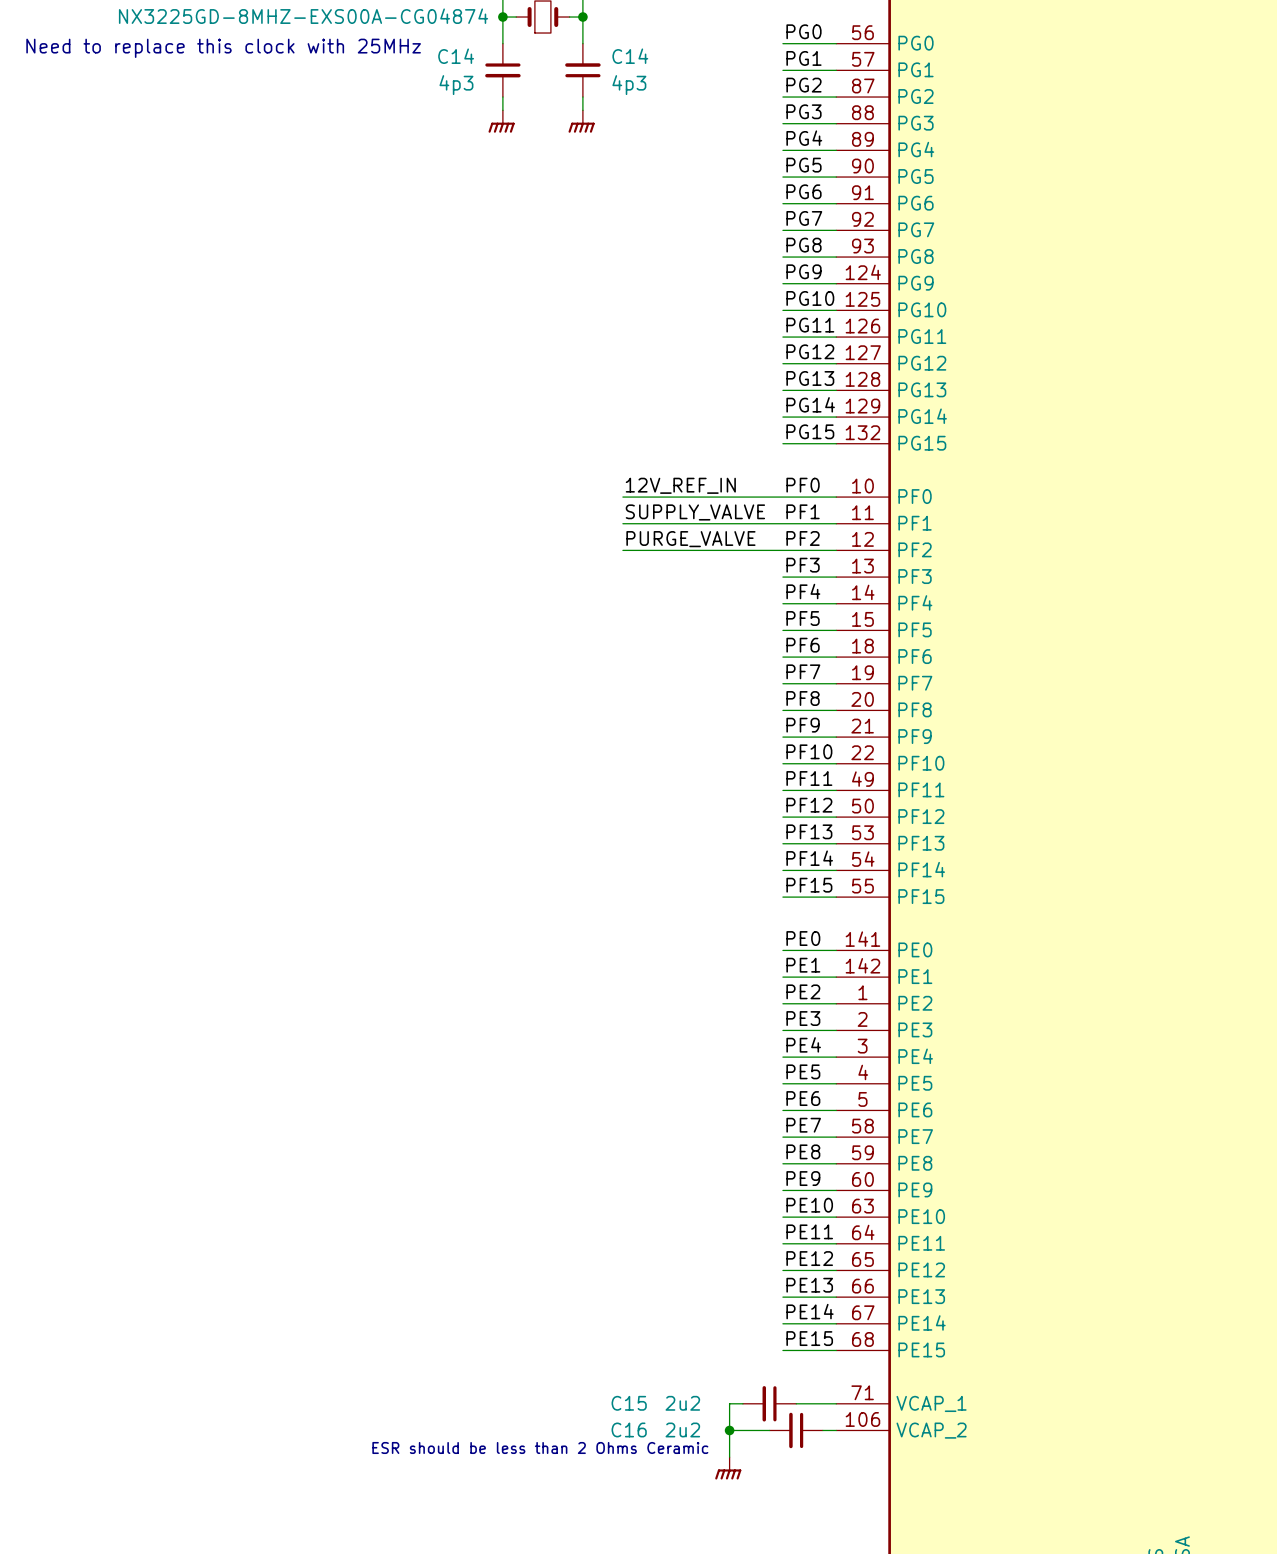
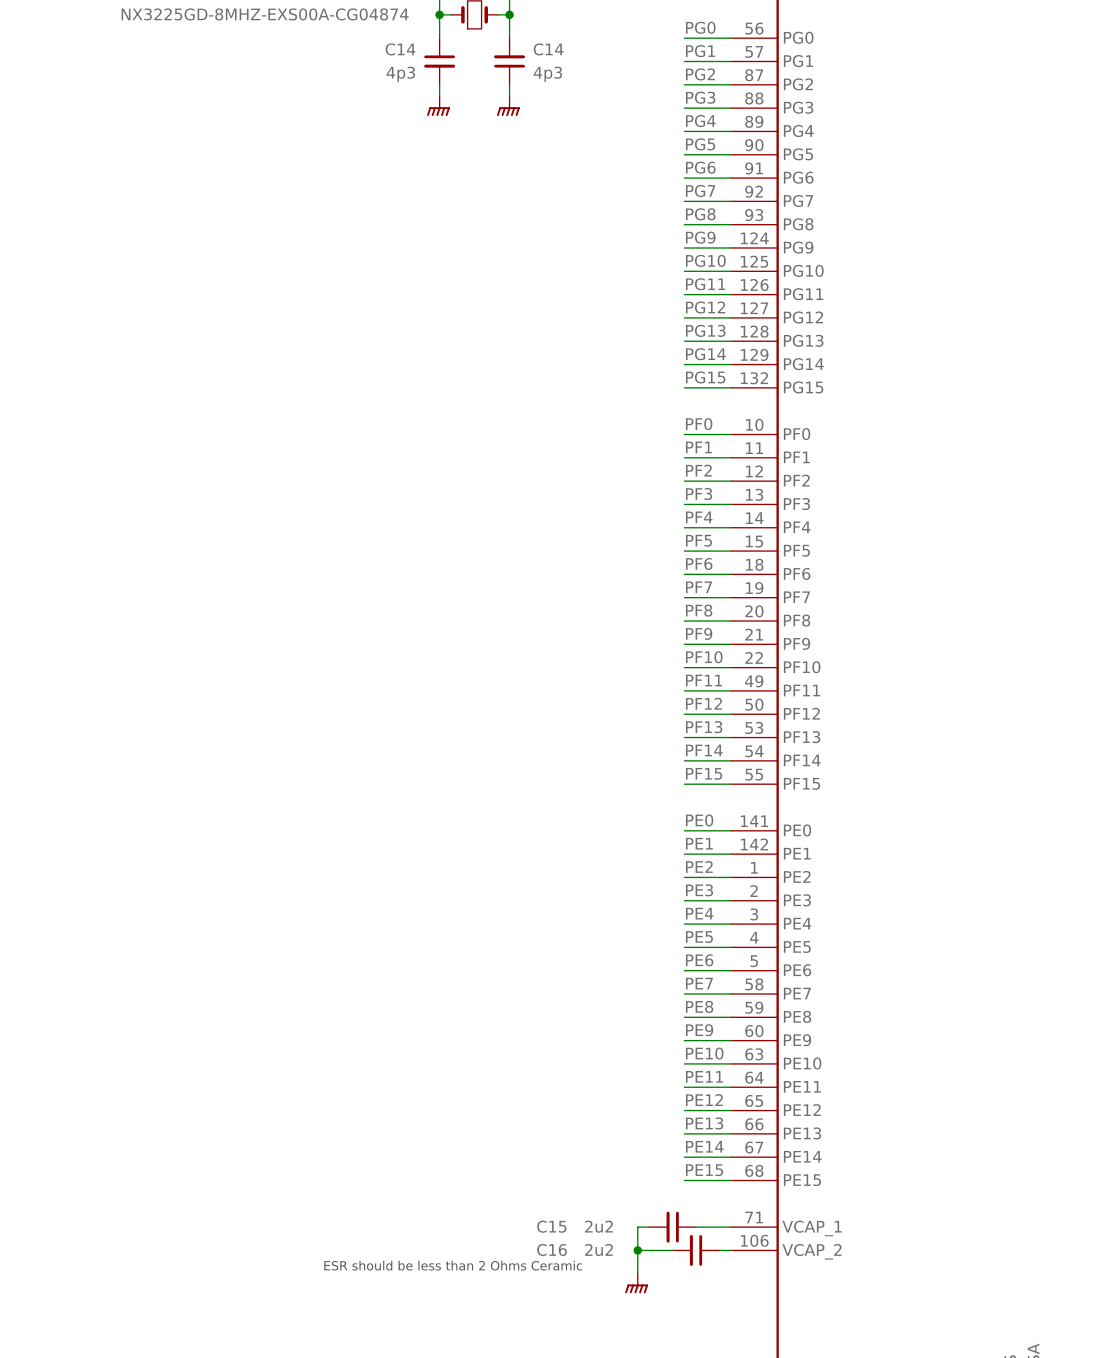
text: Need to replace this clock with 25MHz (223, 48) -> none
label: 12V_REF_IN (680, 485) -> none
wire: (622, 497) (782, 497) -> none
label: SUPPLY_VALVE (695, 512) -> none
wire: (622, 523) (782, 523) -> none
label: PURGE_VALVE (690, 539) -> none
wire: (622, 550) (782, 550) -> none

